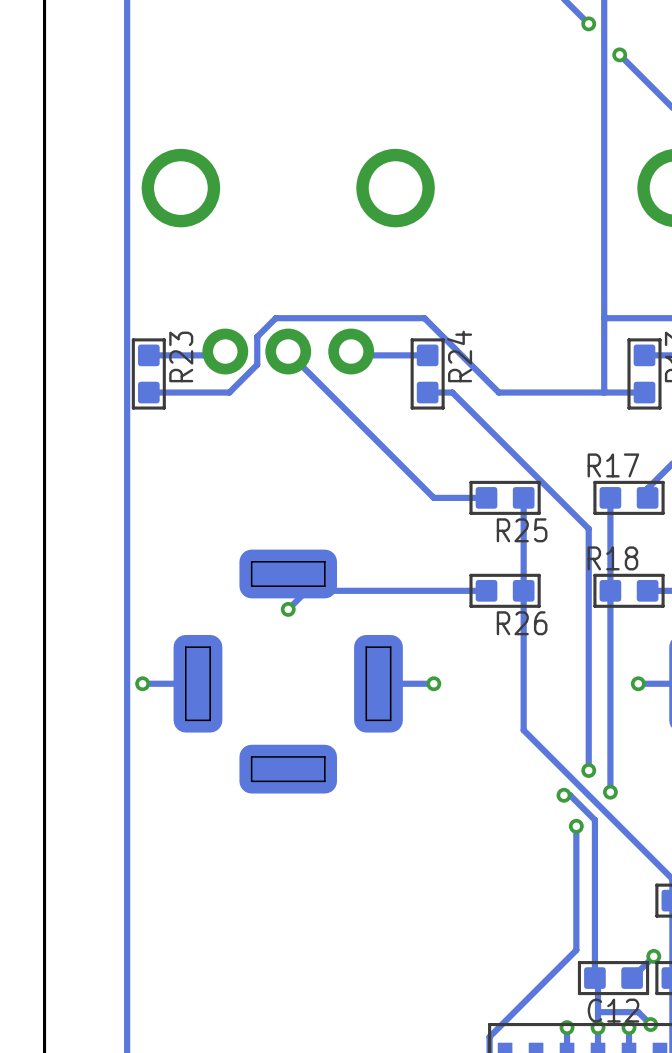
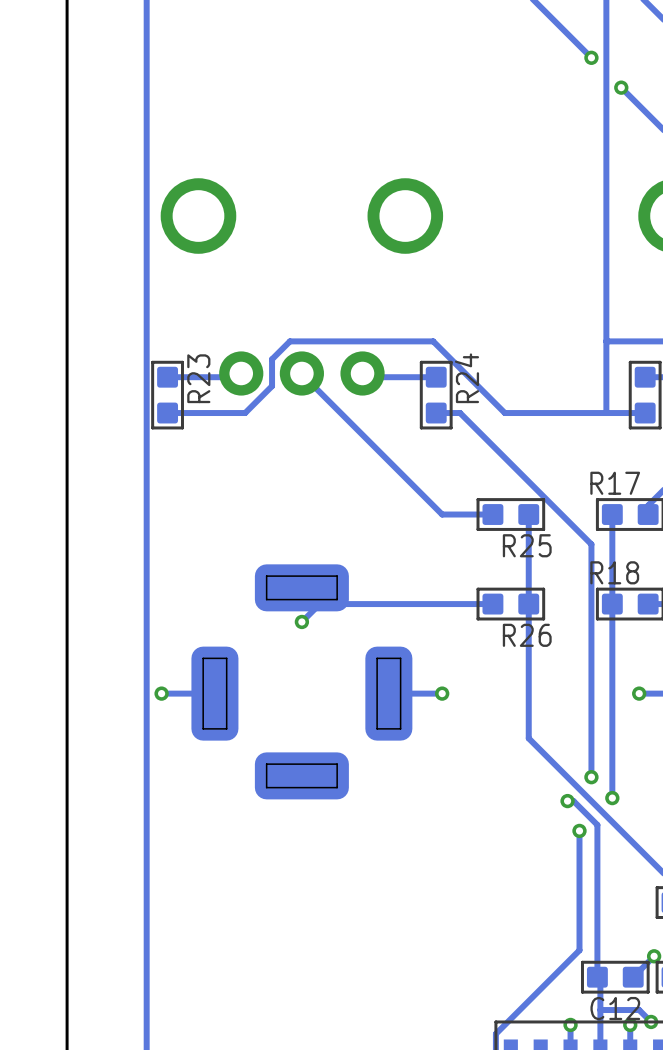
via: (598, 1027) -> none

